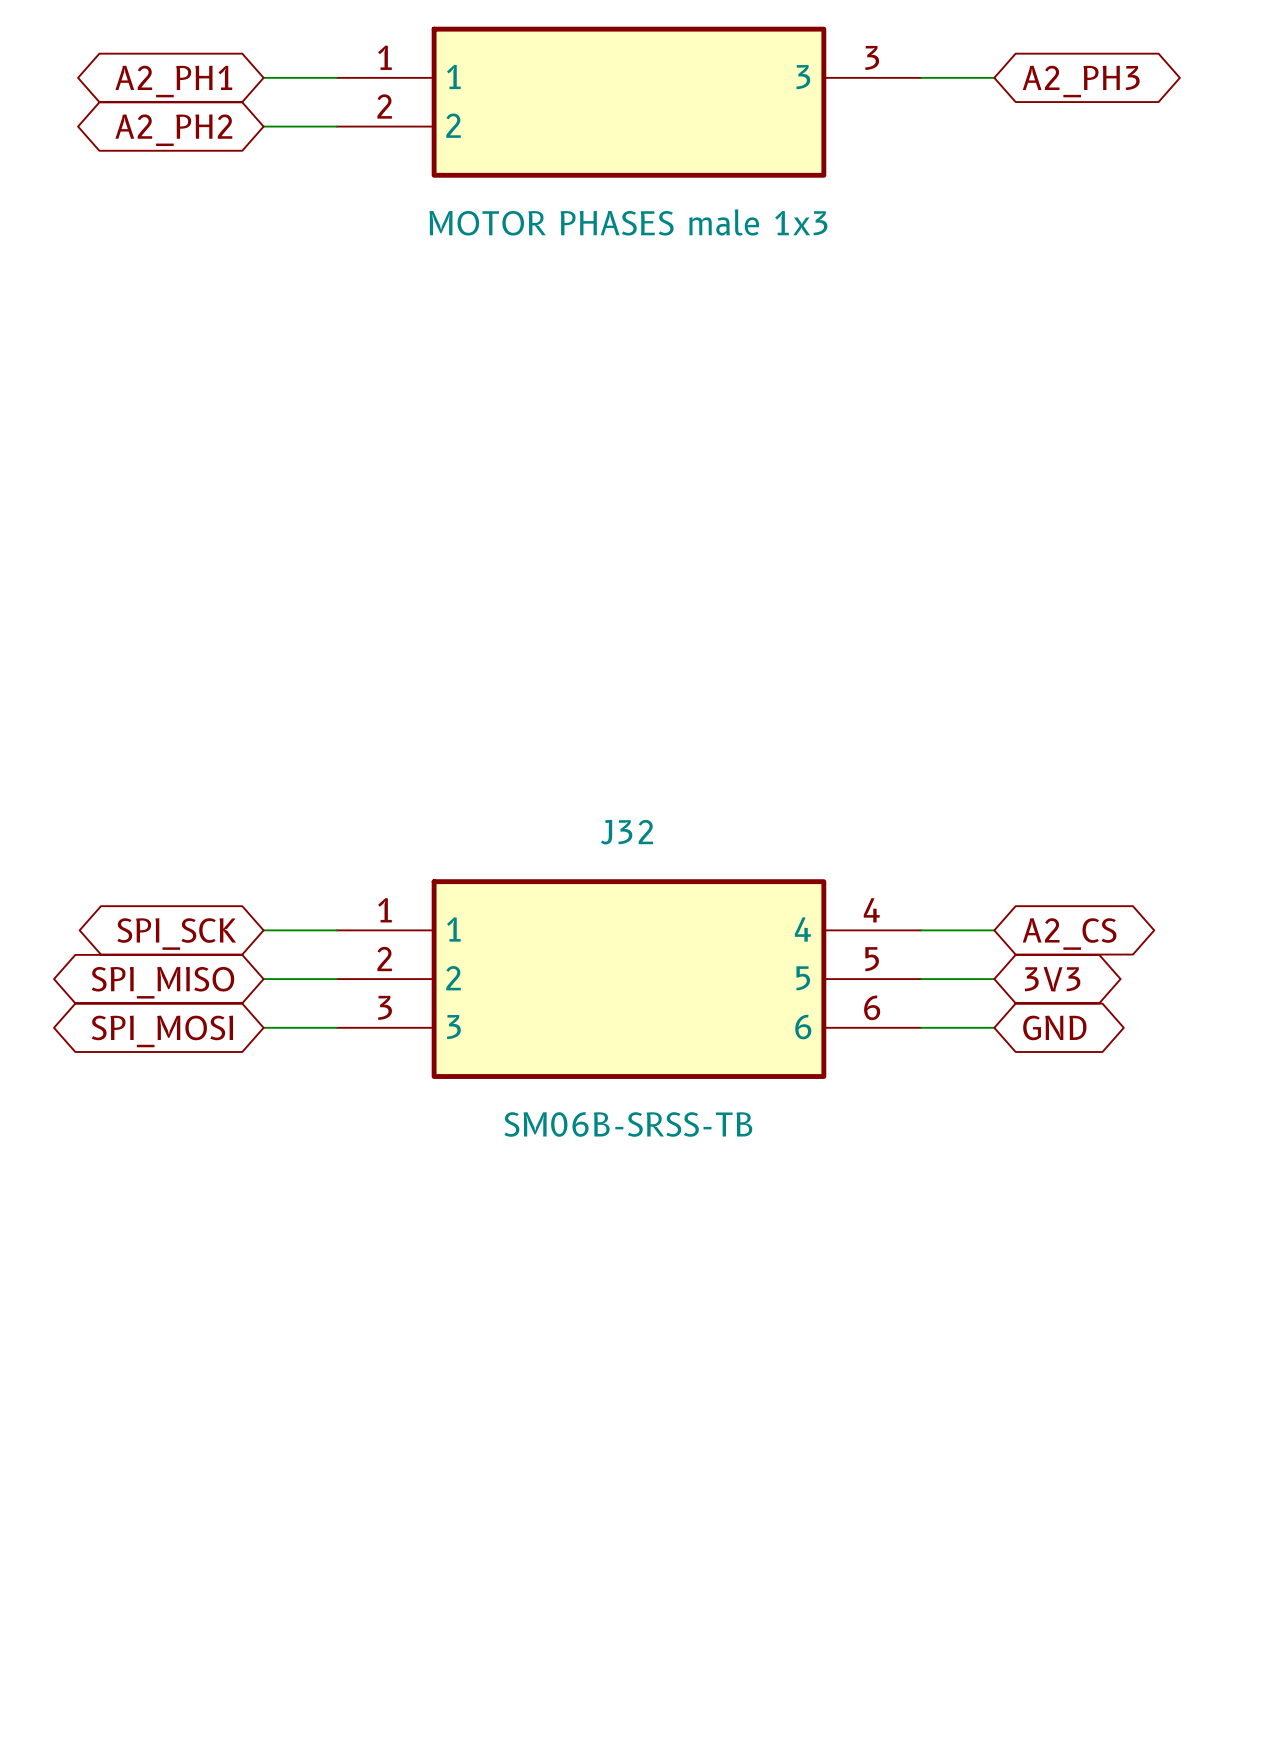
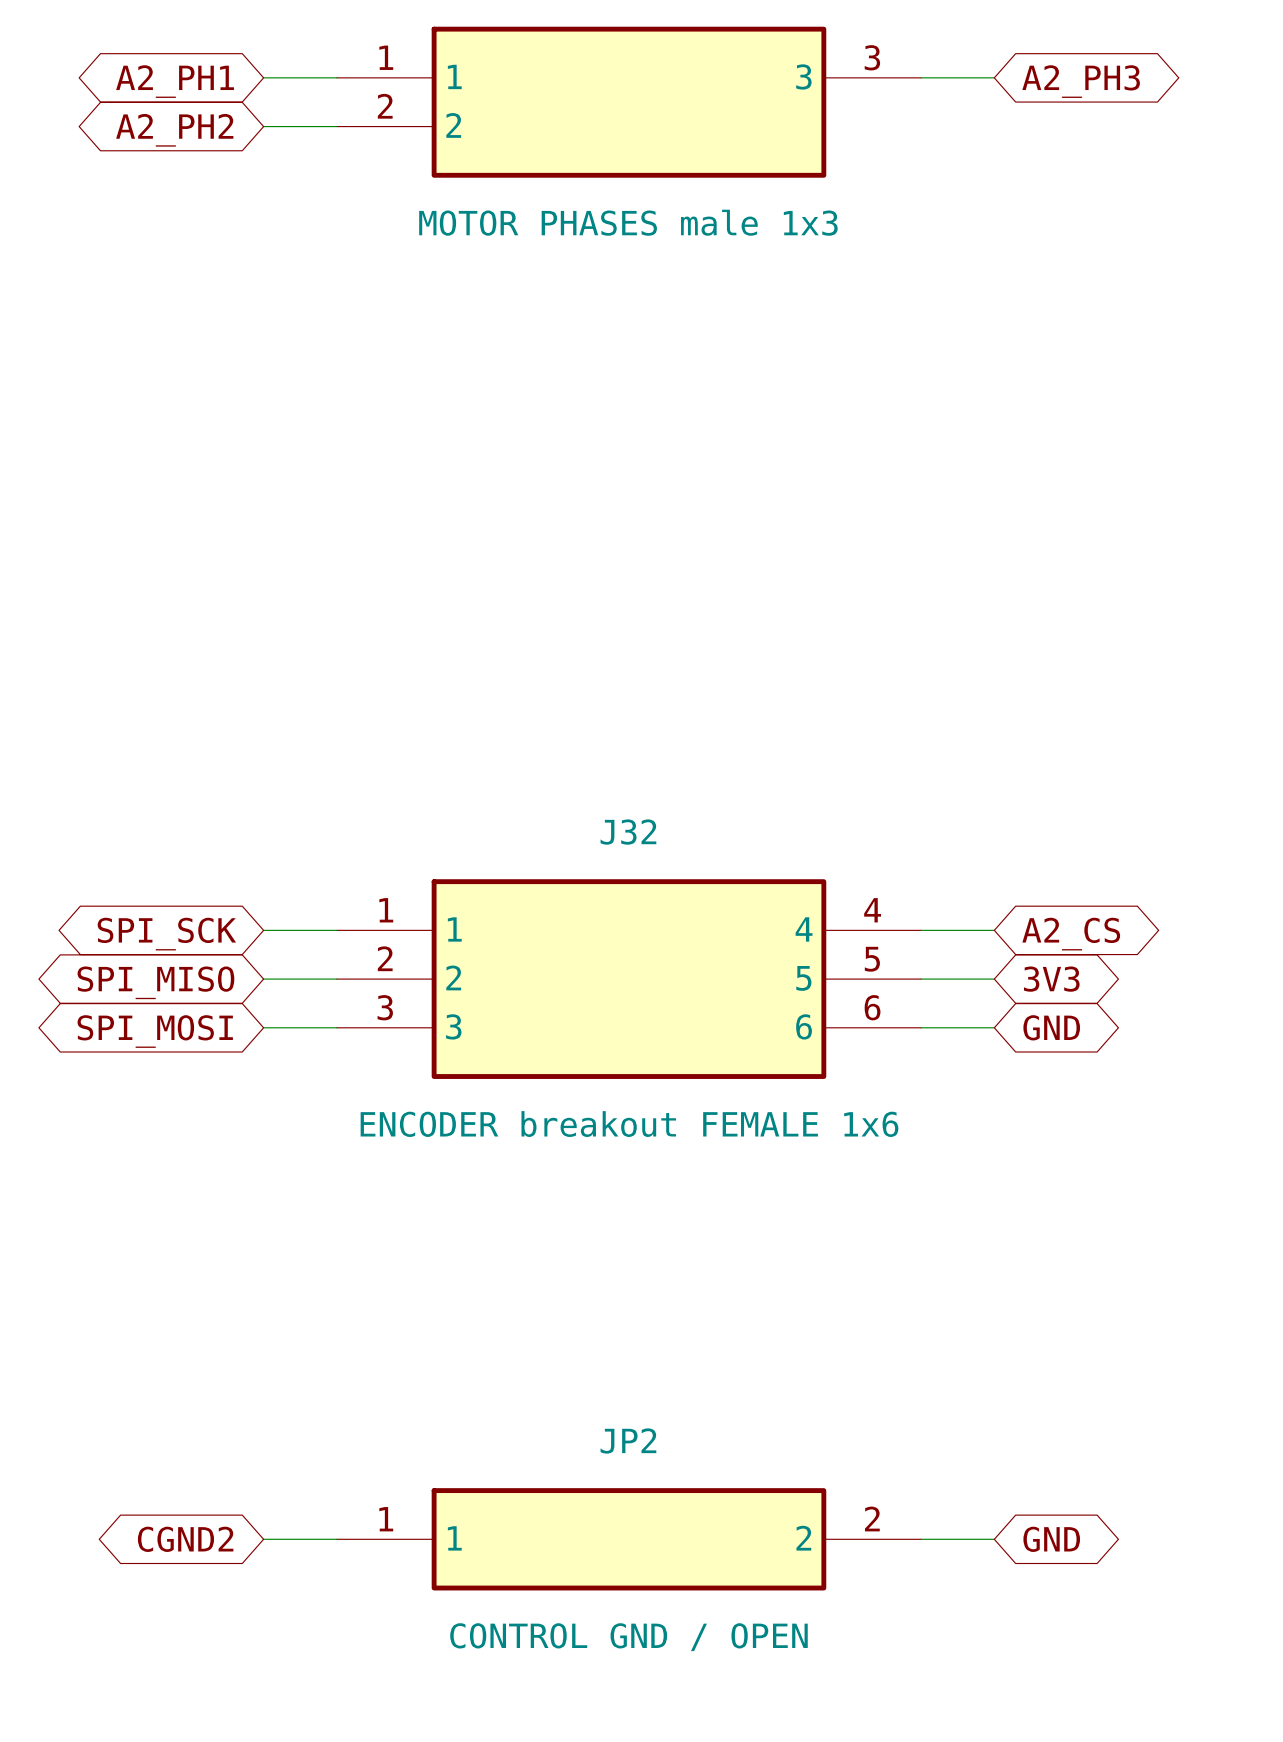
J32 value: SM06B-SRSS-TB (628, 1124) -> ENCODER breakout FEMALE 1x6 (629, 1124)
global label: none -> CGND2 (185, 1539)
wire: none -> (263, 1539) (336, 1539)
JP2: none -> CONTROL GND / OPEN (628, 1539)
wire: none -> (921, 1539) (994, 1539)
global label: none -> GND (1051, 1539)

